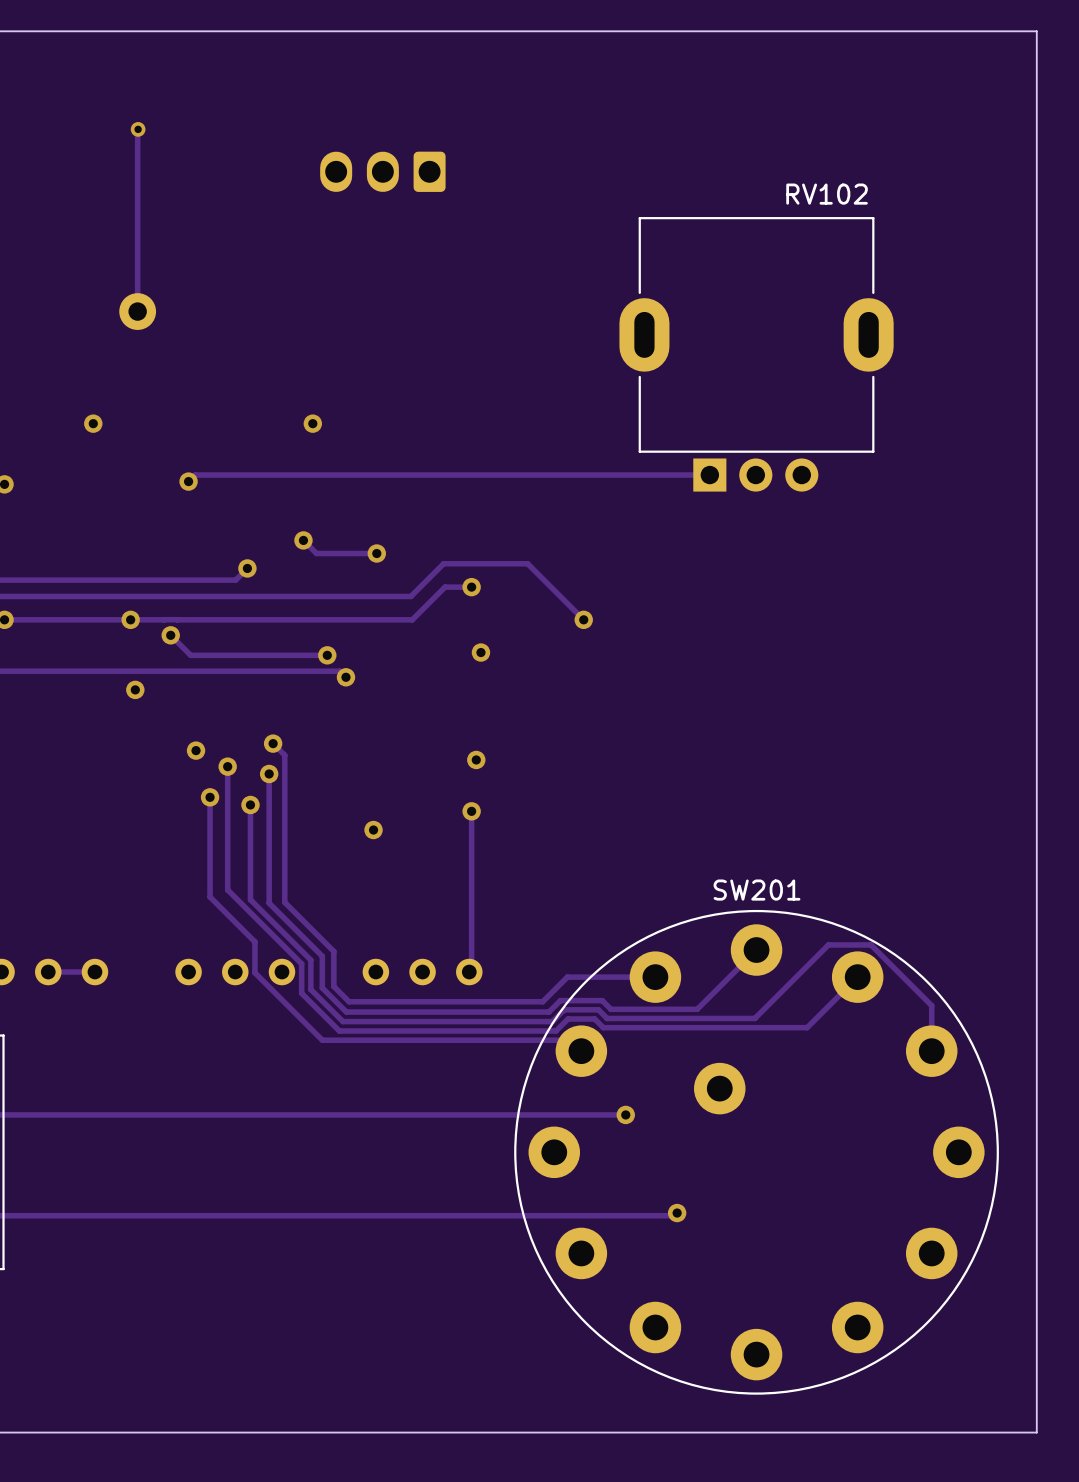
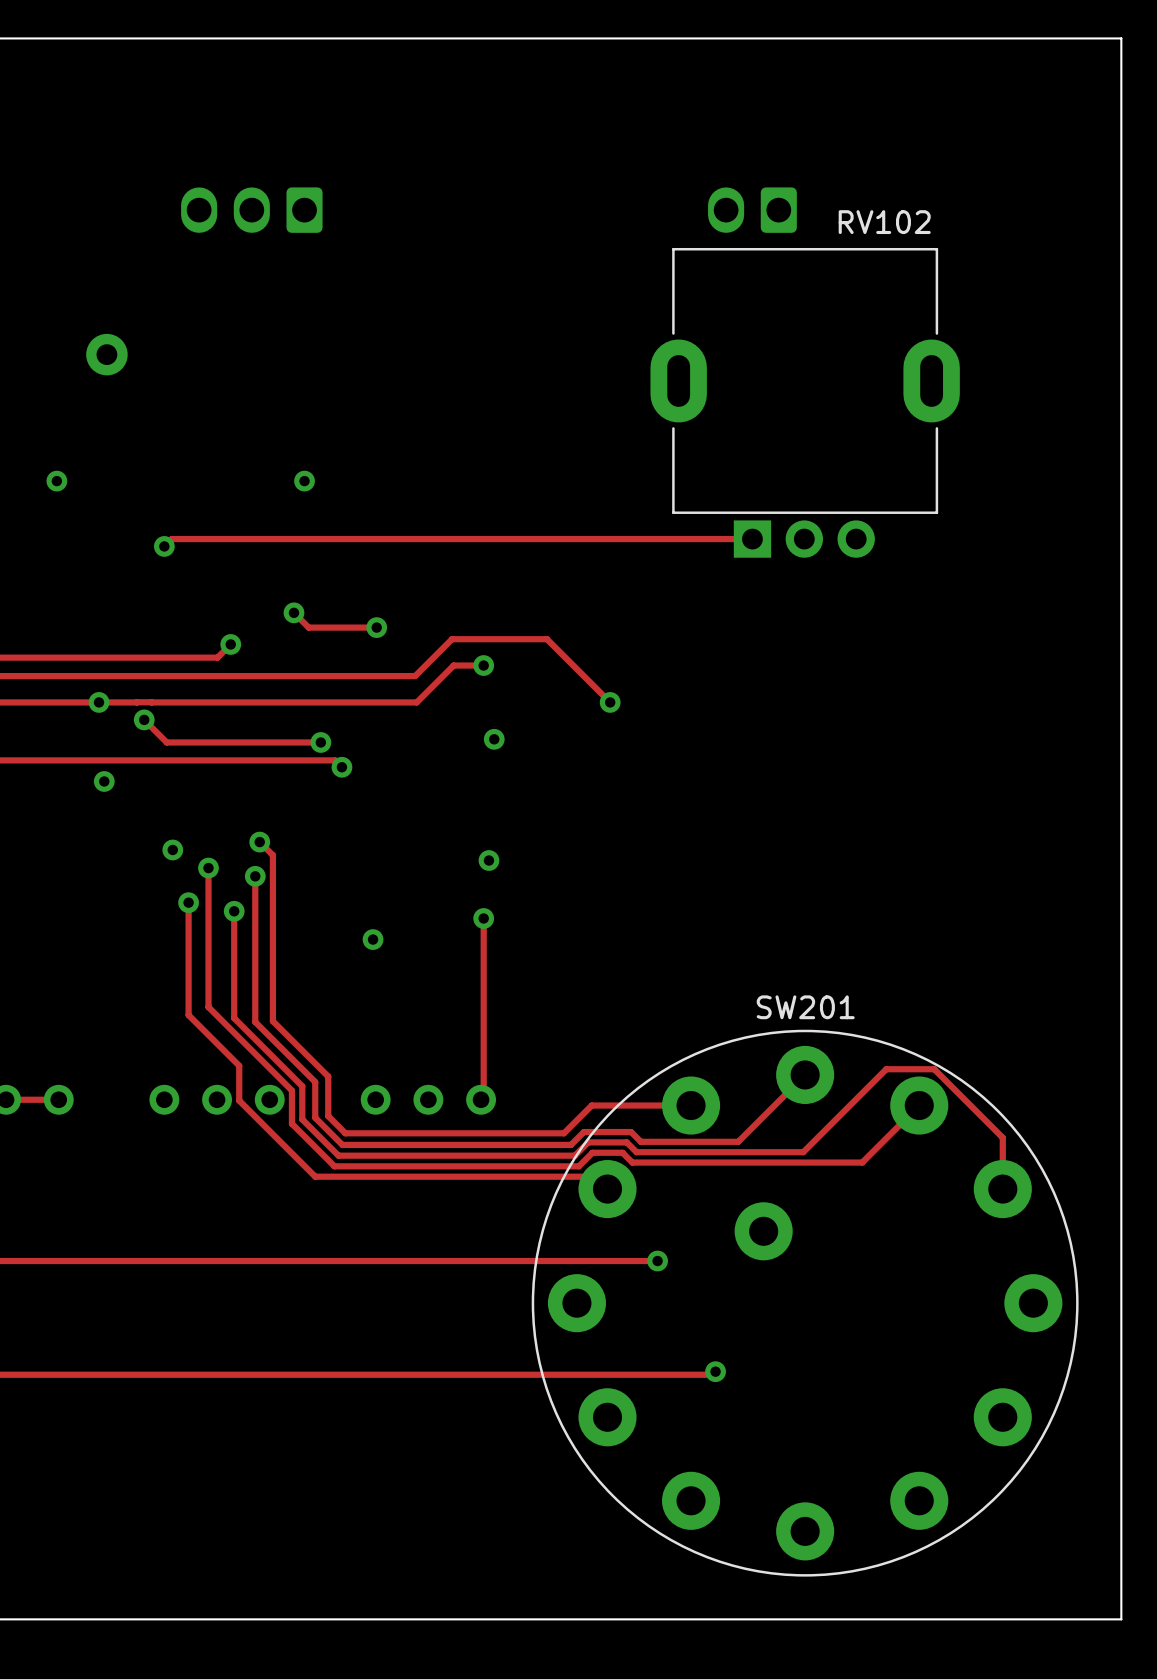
track: (138, 129) (137, 311) -> none
via: (138, 129) -> none
part position: (382, 171) -> (251, 210)
part: none -> (752, 210)

